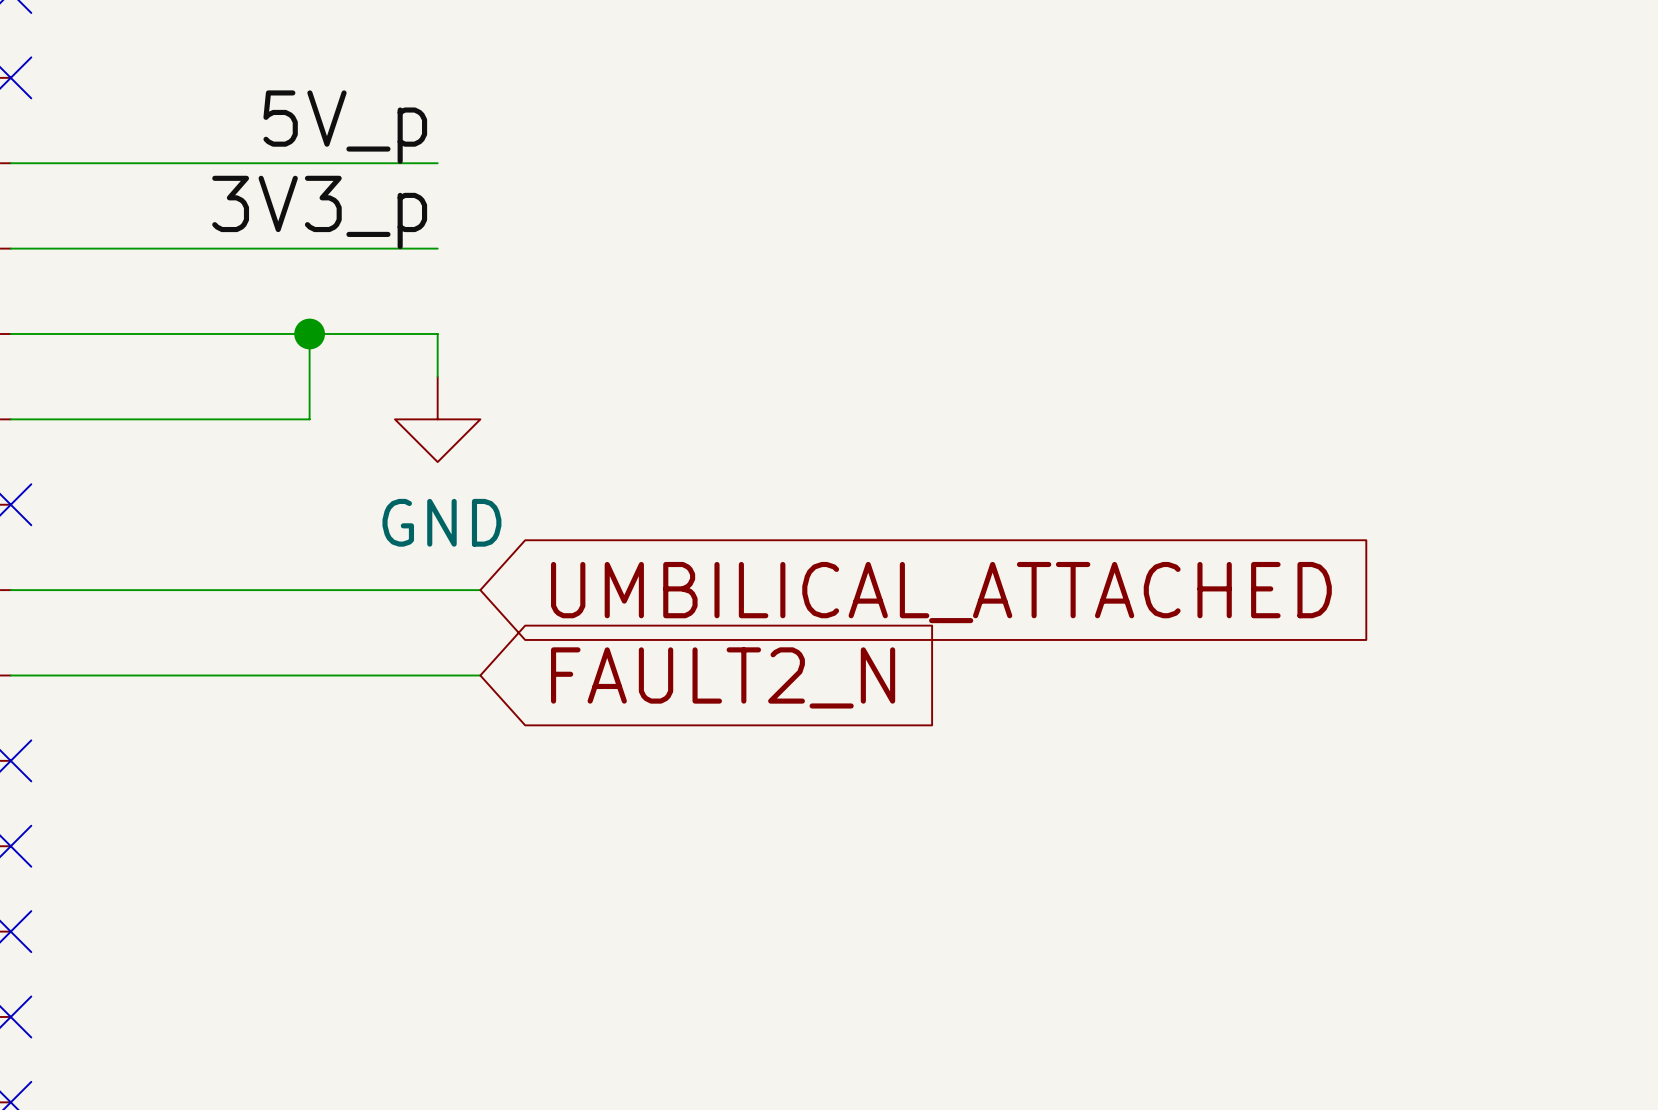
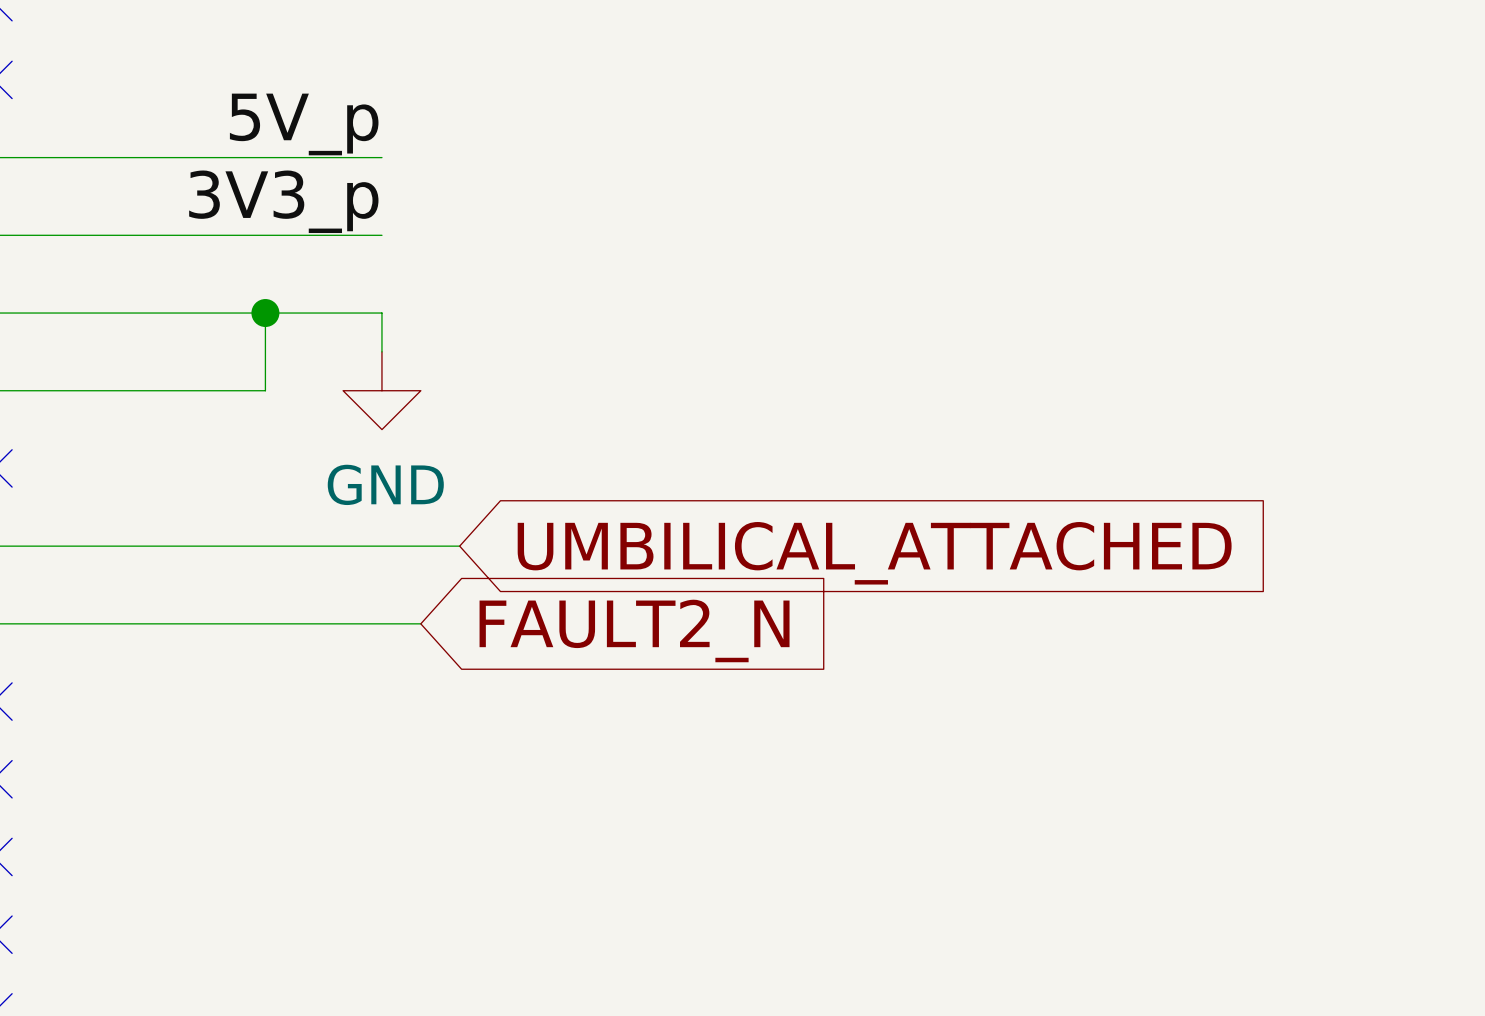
wire: none -> (420, 546) (459, 546)
global label position: UMBILICAL_ATTACHED (941, 592) -> UMBILICAL_ATTACHED (874, 553)

